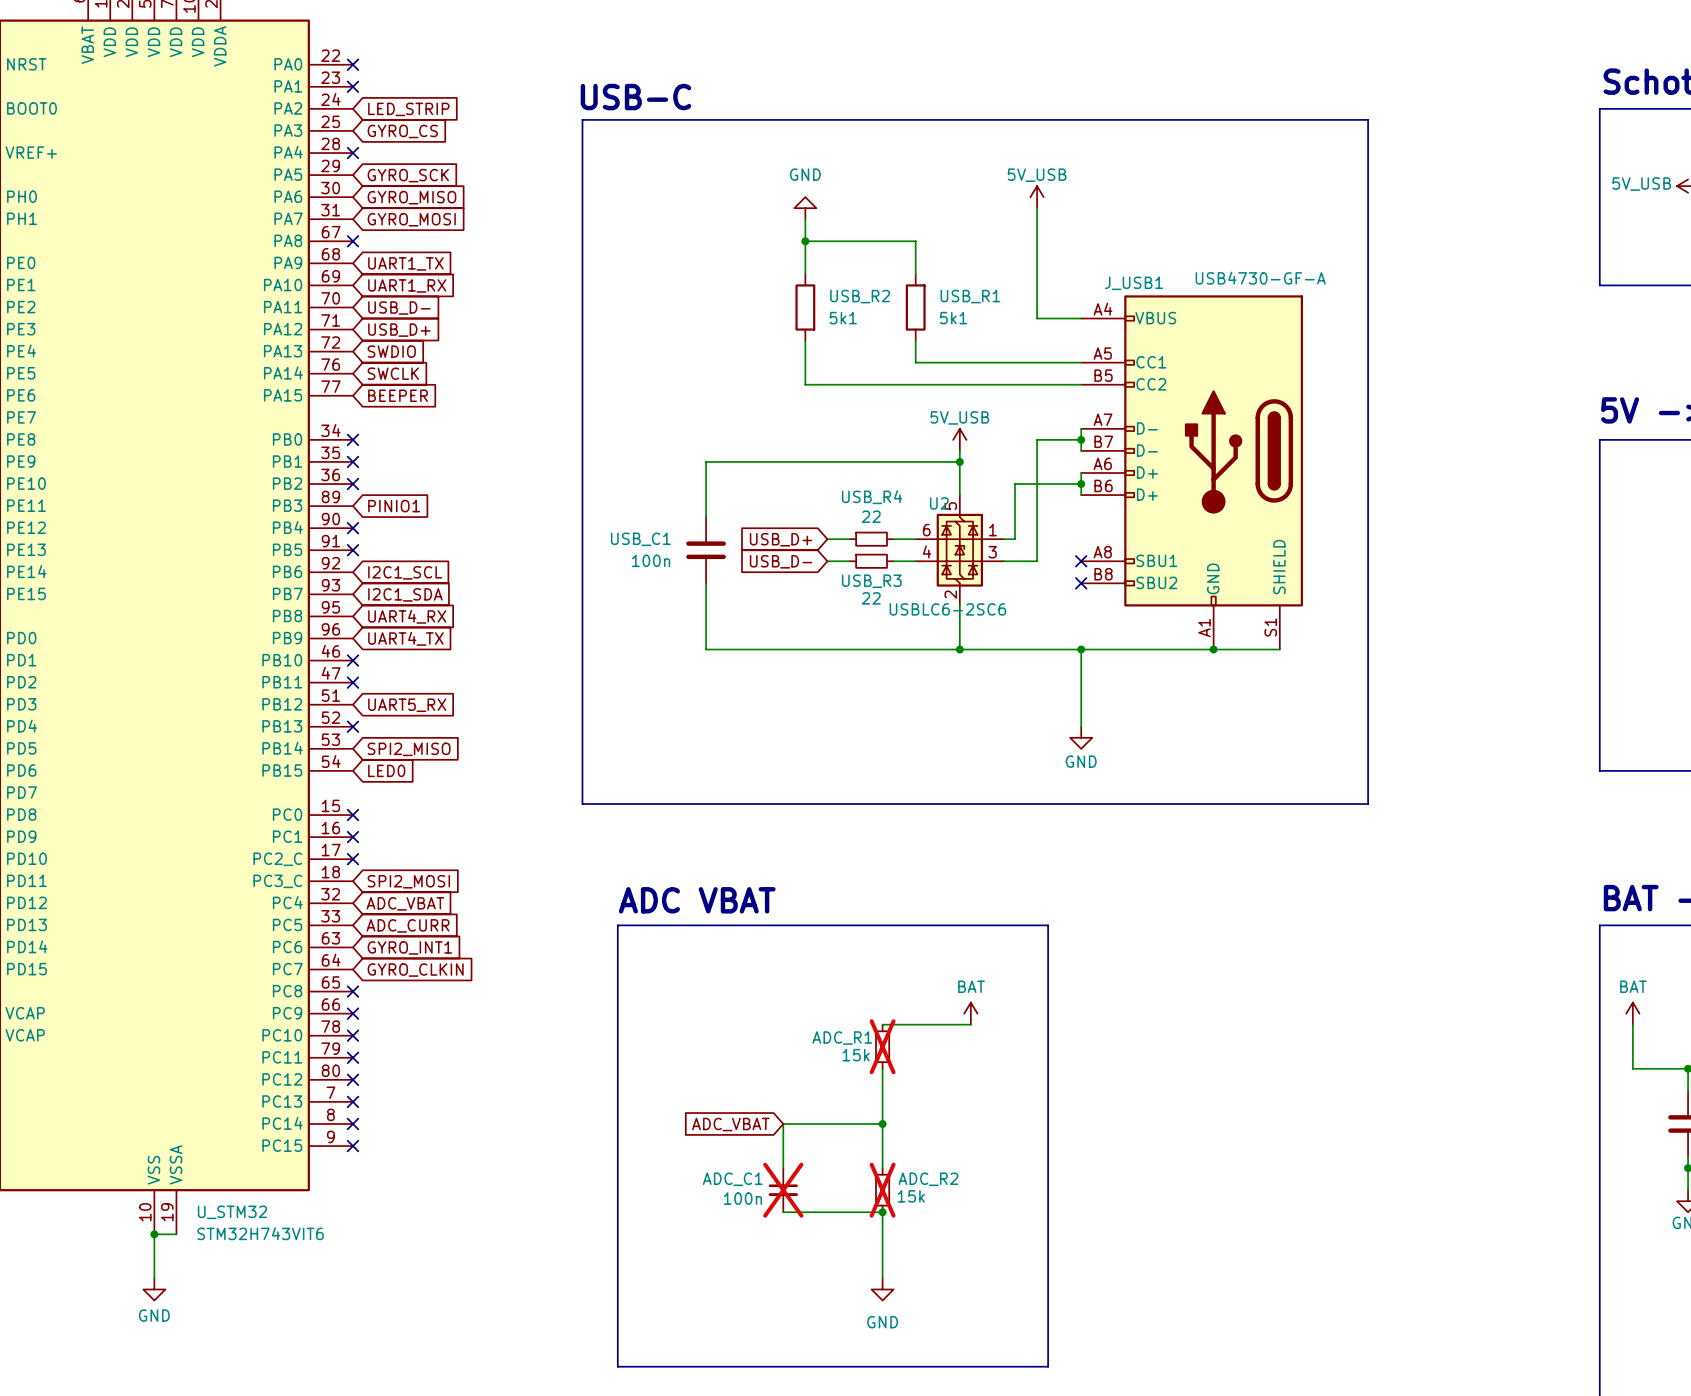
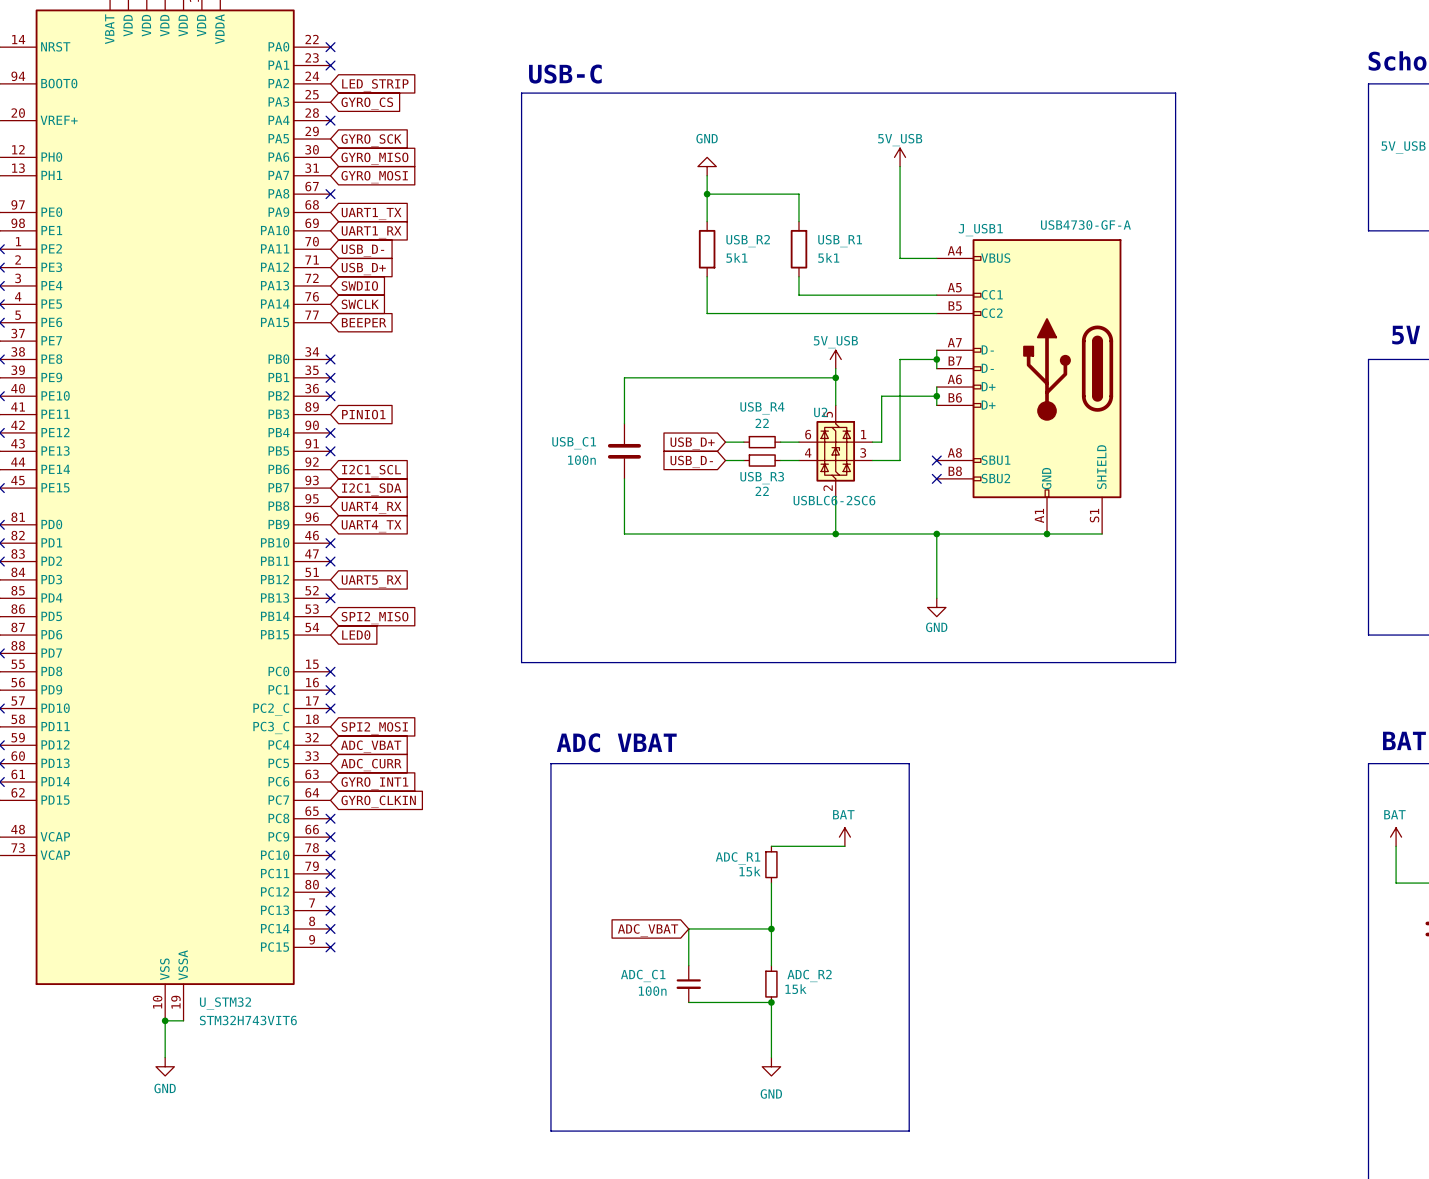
ADC_R1 do-not-place cross: (882, 1046) -> none
ADC_C1 do-not-place cross: (783, 1190) -> none
ADC_R2 do-not-place cross: (882, 1190) -> none

